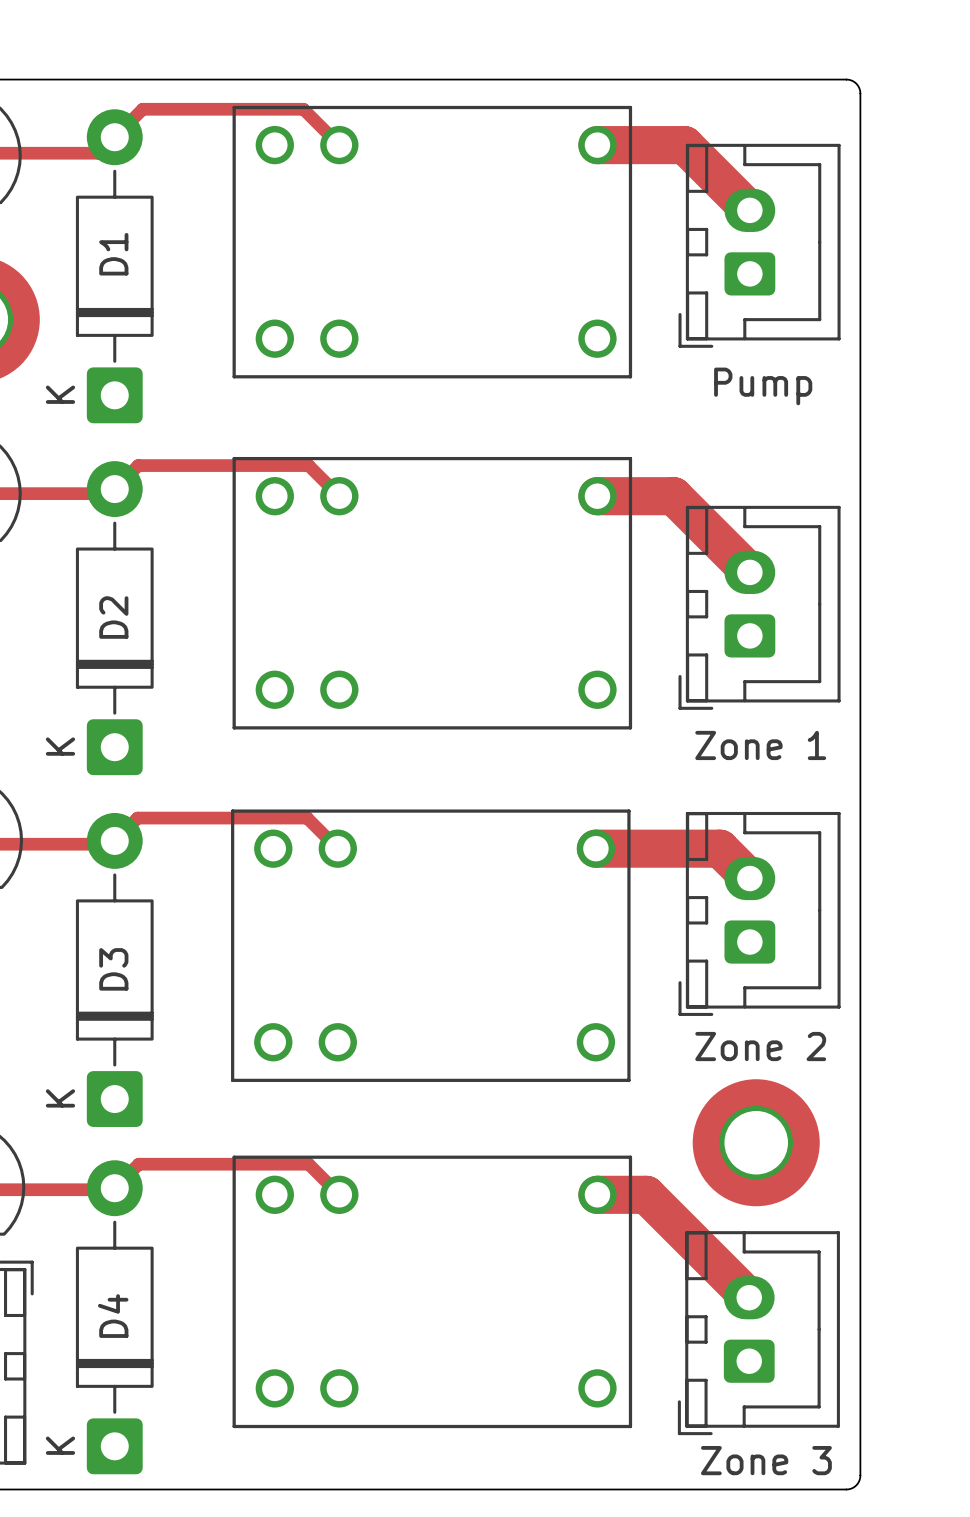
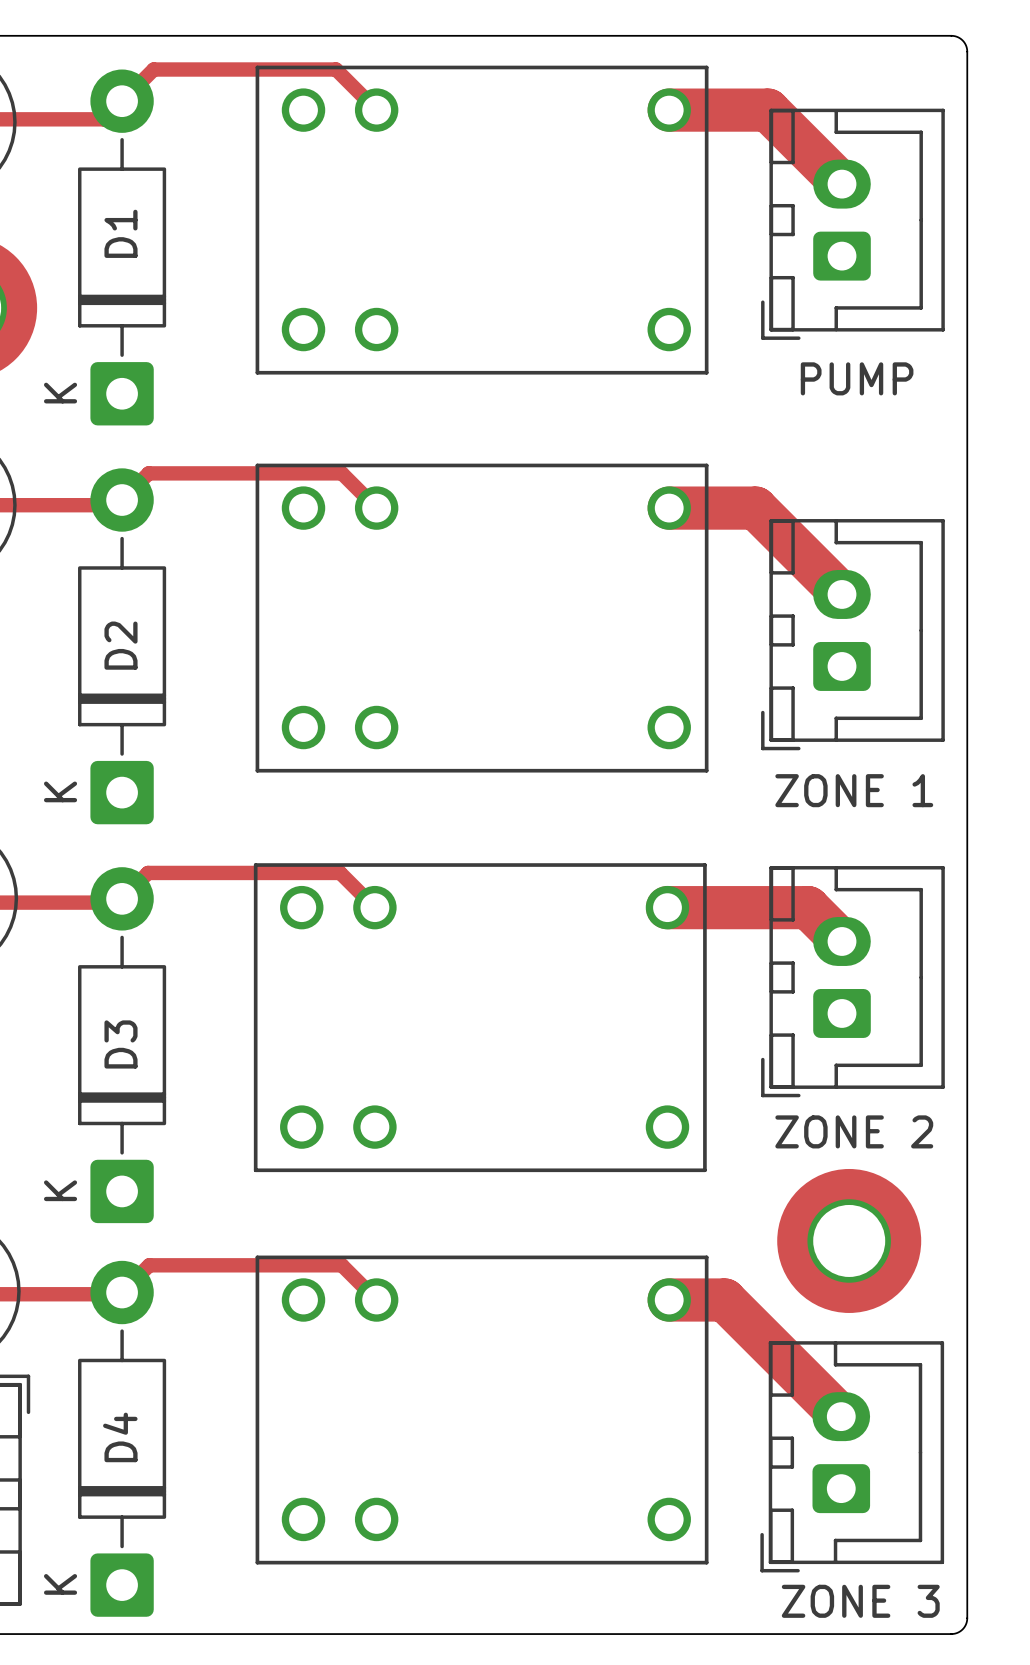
part value: Pump (763, 386) -> PUMP (857, 378)
part value: Zone 1 (760, 745) -> ZONE 1 (854, 790)
part value: Zone 2 (760, 1046) -> ZONE 2 (854, 1131)
part value: Zone 3 (766, 1460) -> ZONE 3 (860, 1601)

